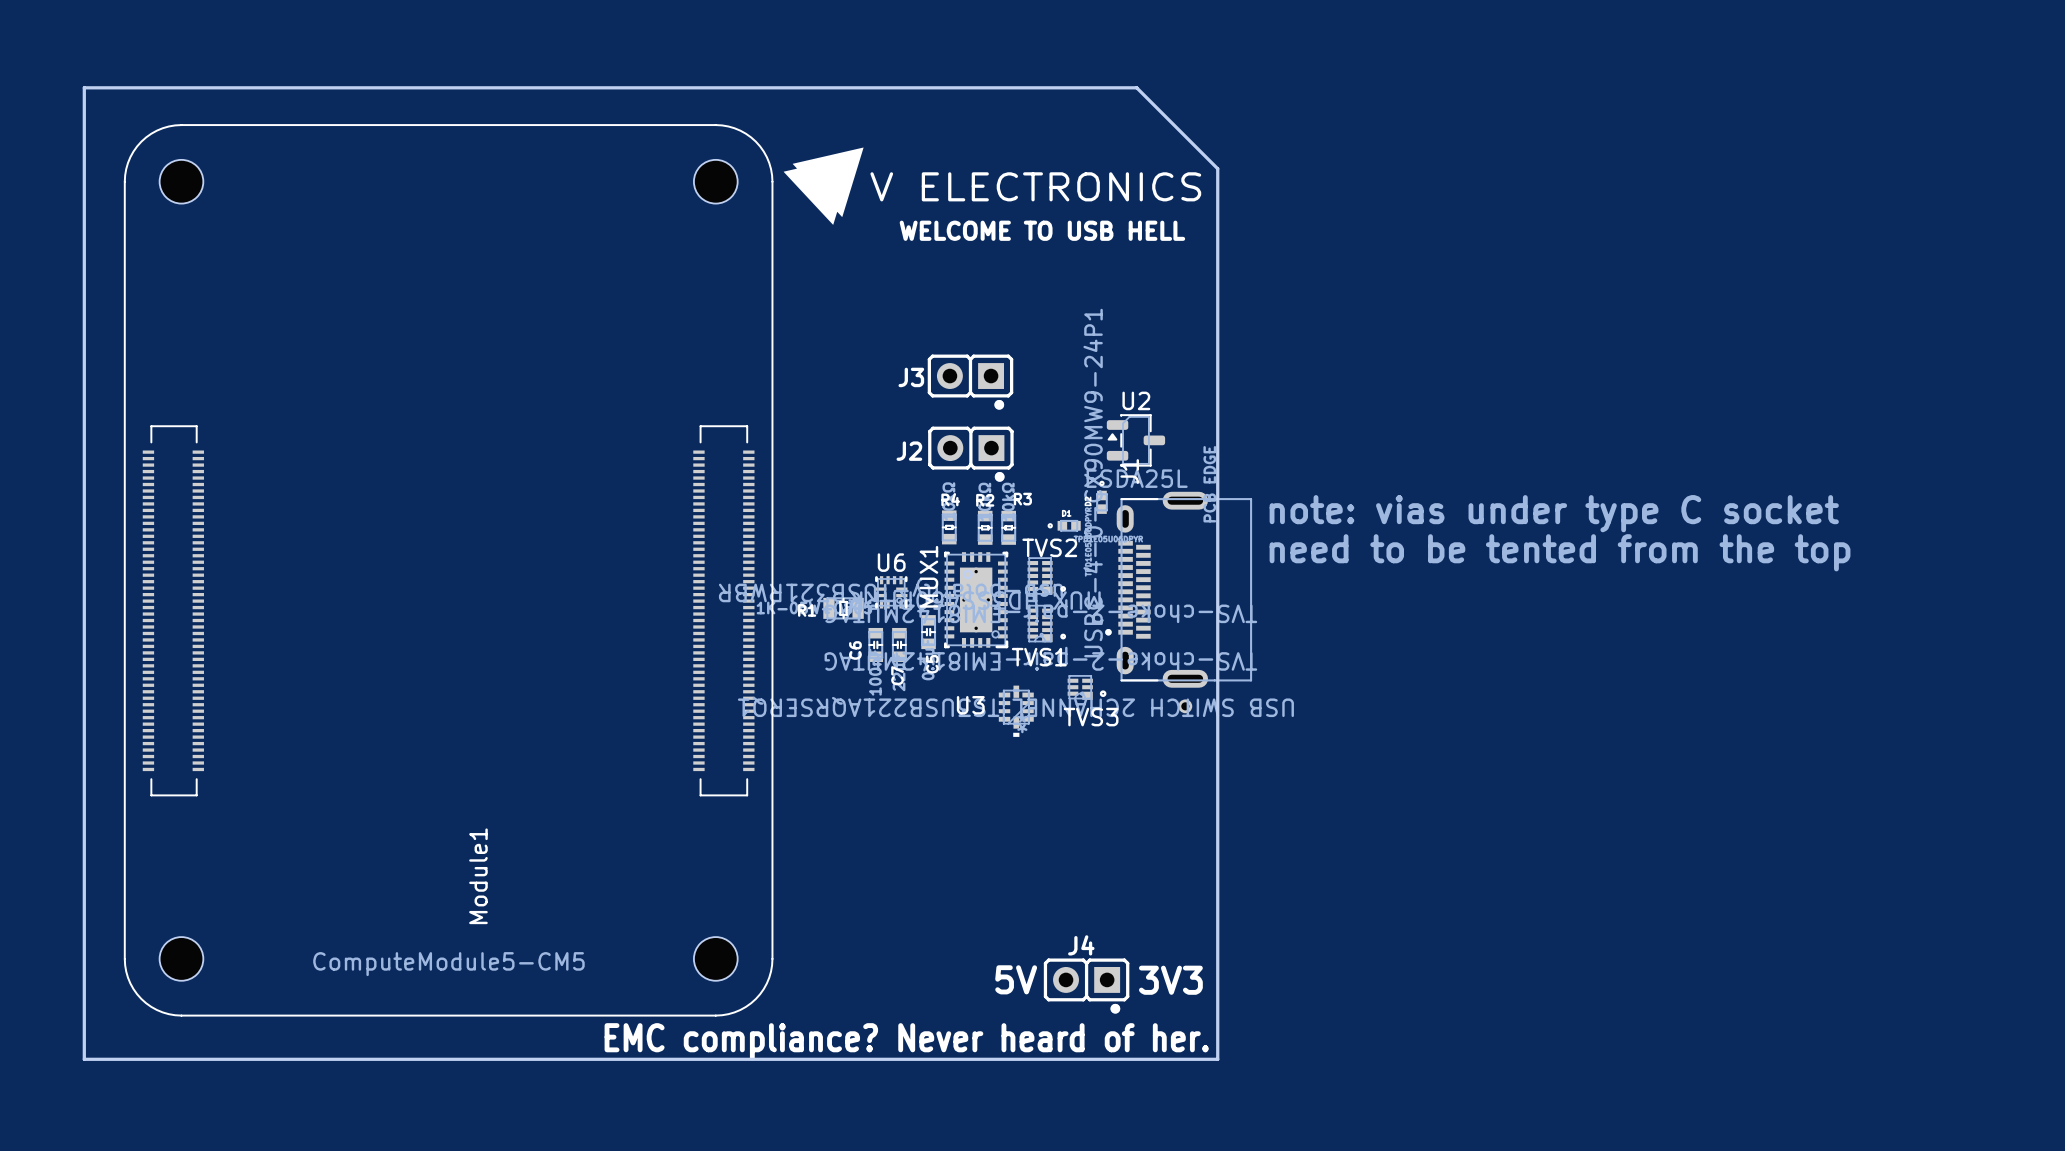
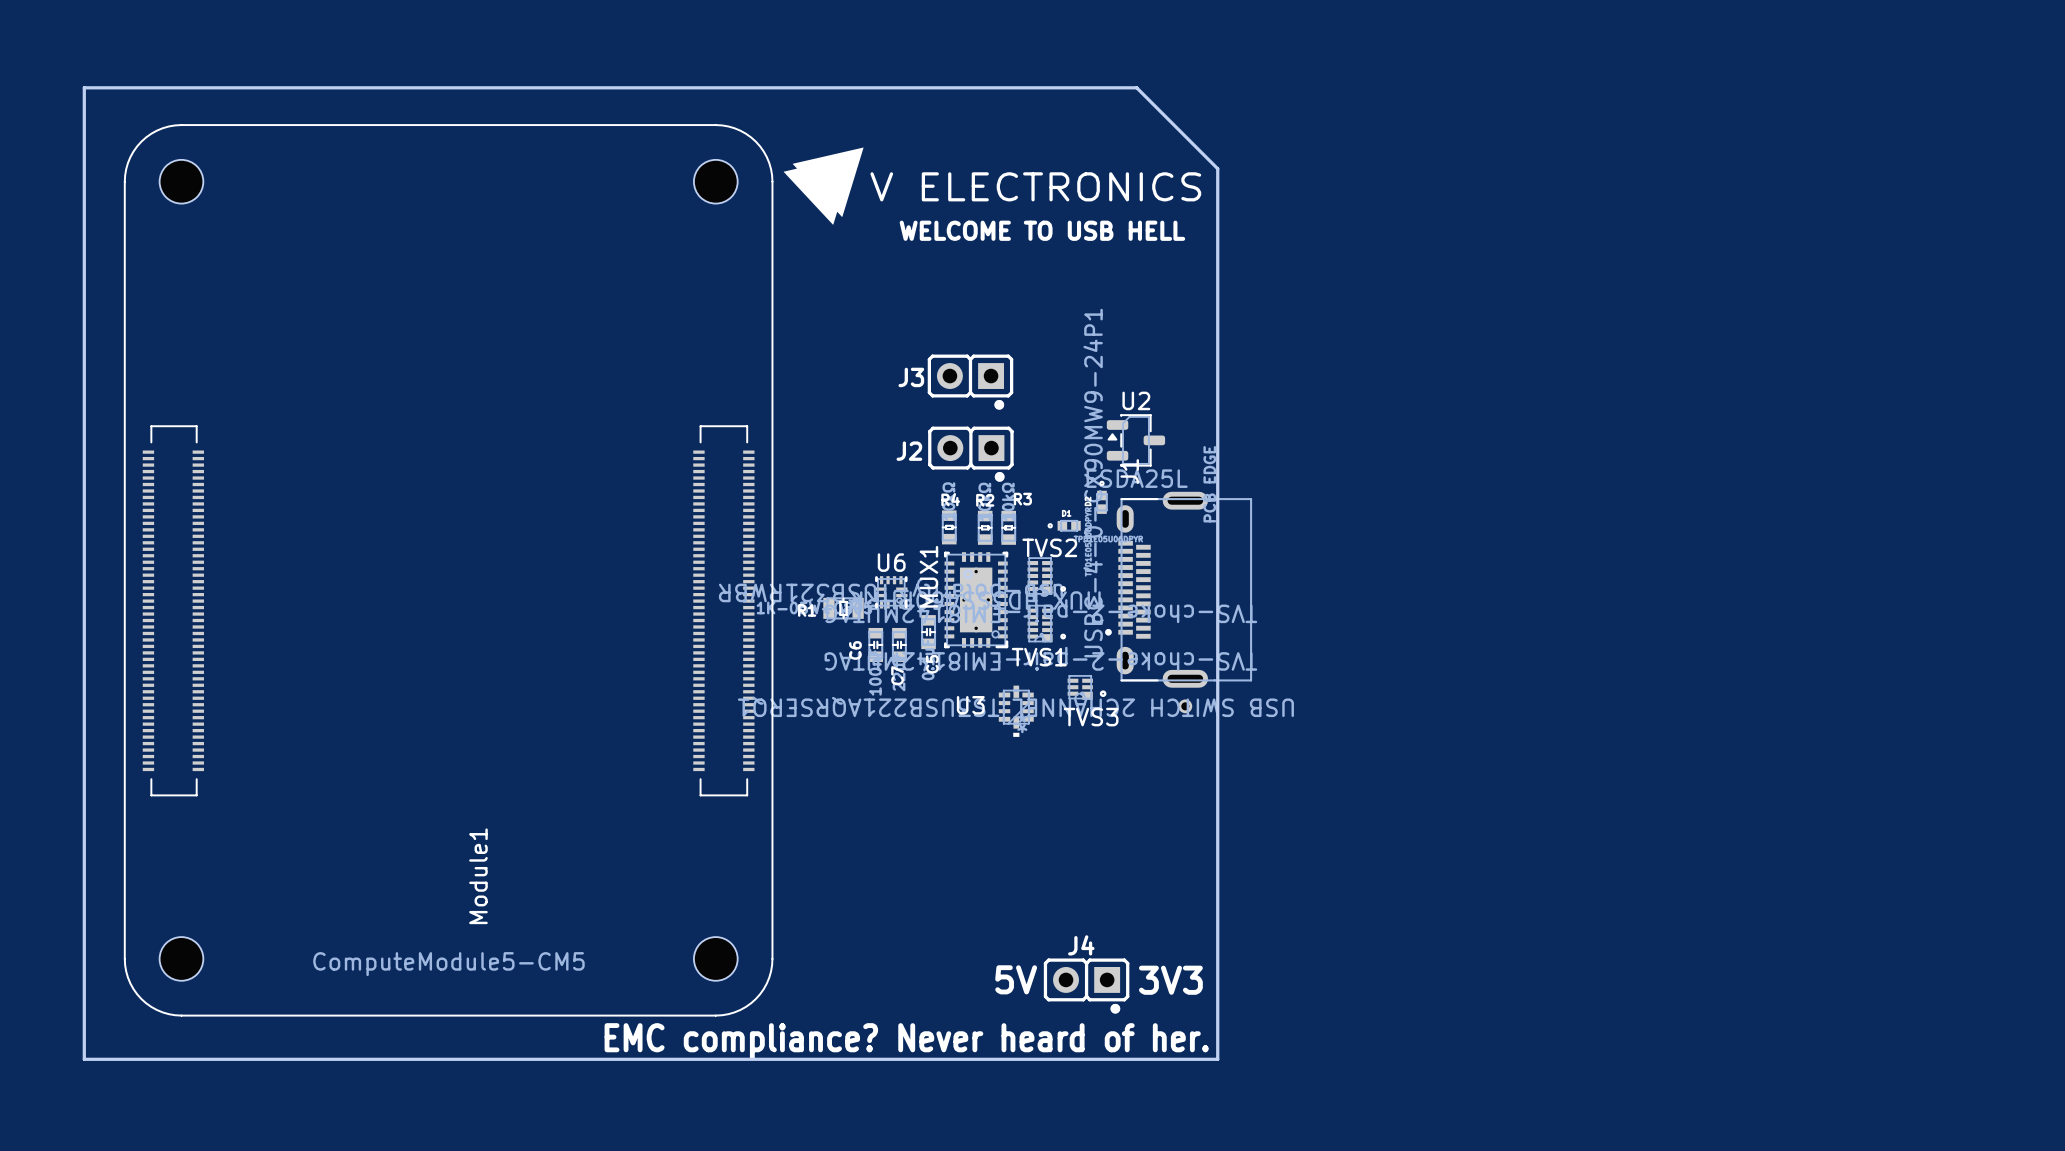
text: note: vias under type C socket (1554, 513) -> none
text: need to be tented from the top (1560, 552) -> none

